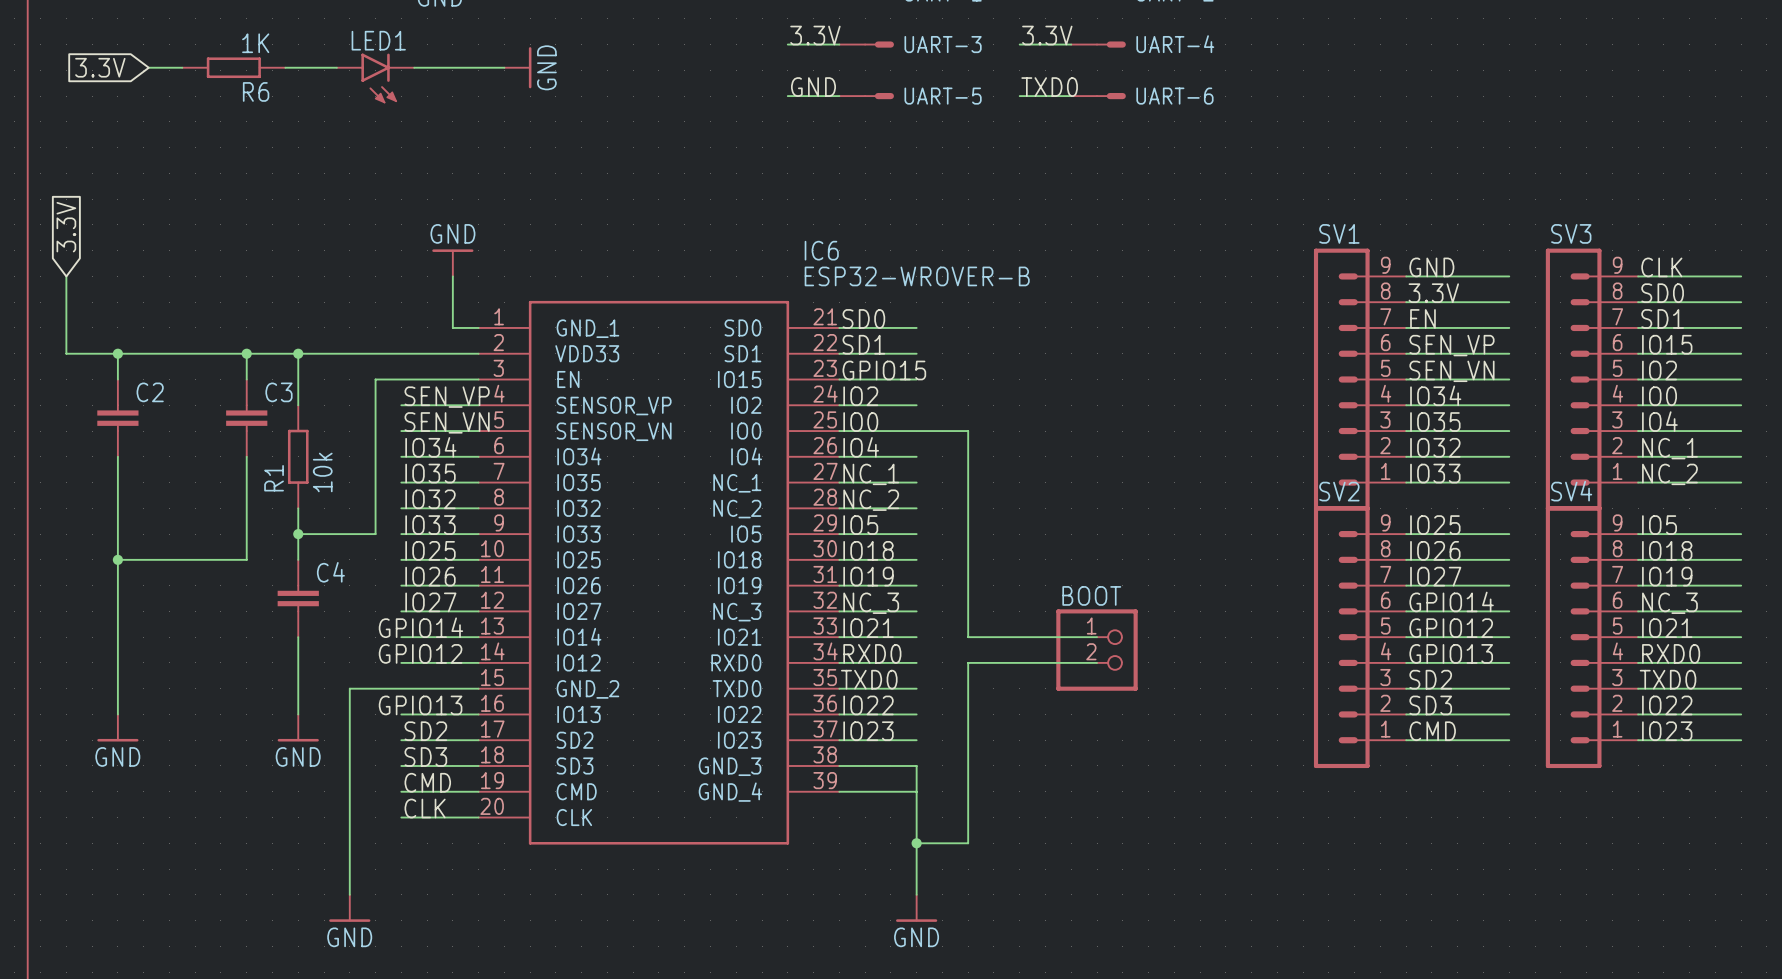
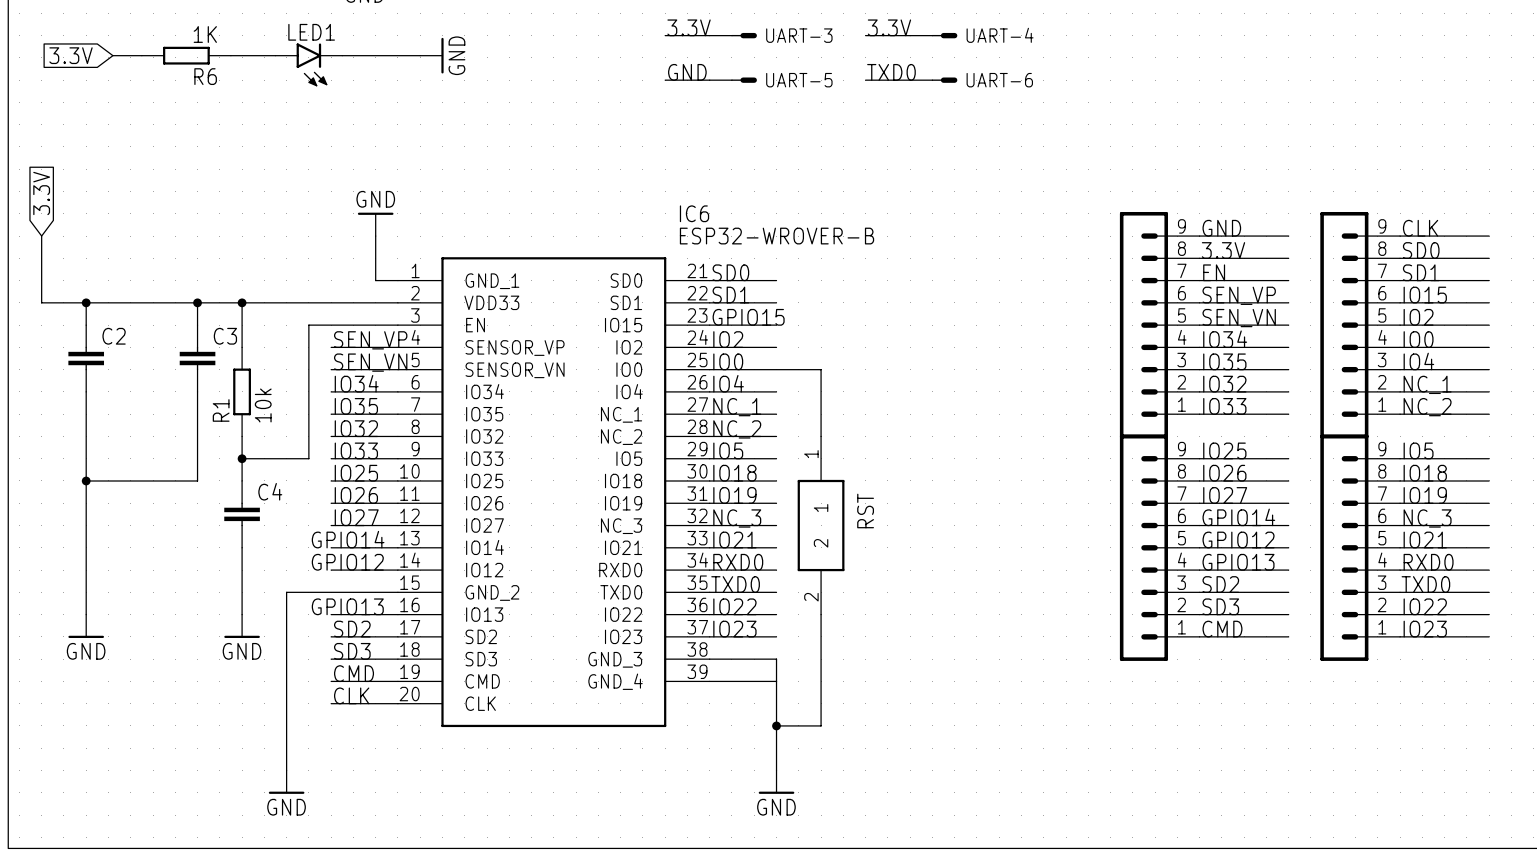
SV1 name: SV1 (1339, 233) -> none
SV3 name: SV3 (1571, 233) -> none
SV2 name: SV2 (1339, 491) -> none
SV4 name: SV4 (1571, 491) -> none
wire: (968, 508) (968, 637) (1097, 637) -> none
RST: none -> (821, 525)
BOOT: (1097, 650) -> none
wire: (1097, 662) (968, 662) (968, 714) -> none

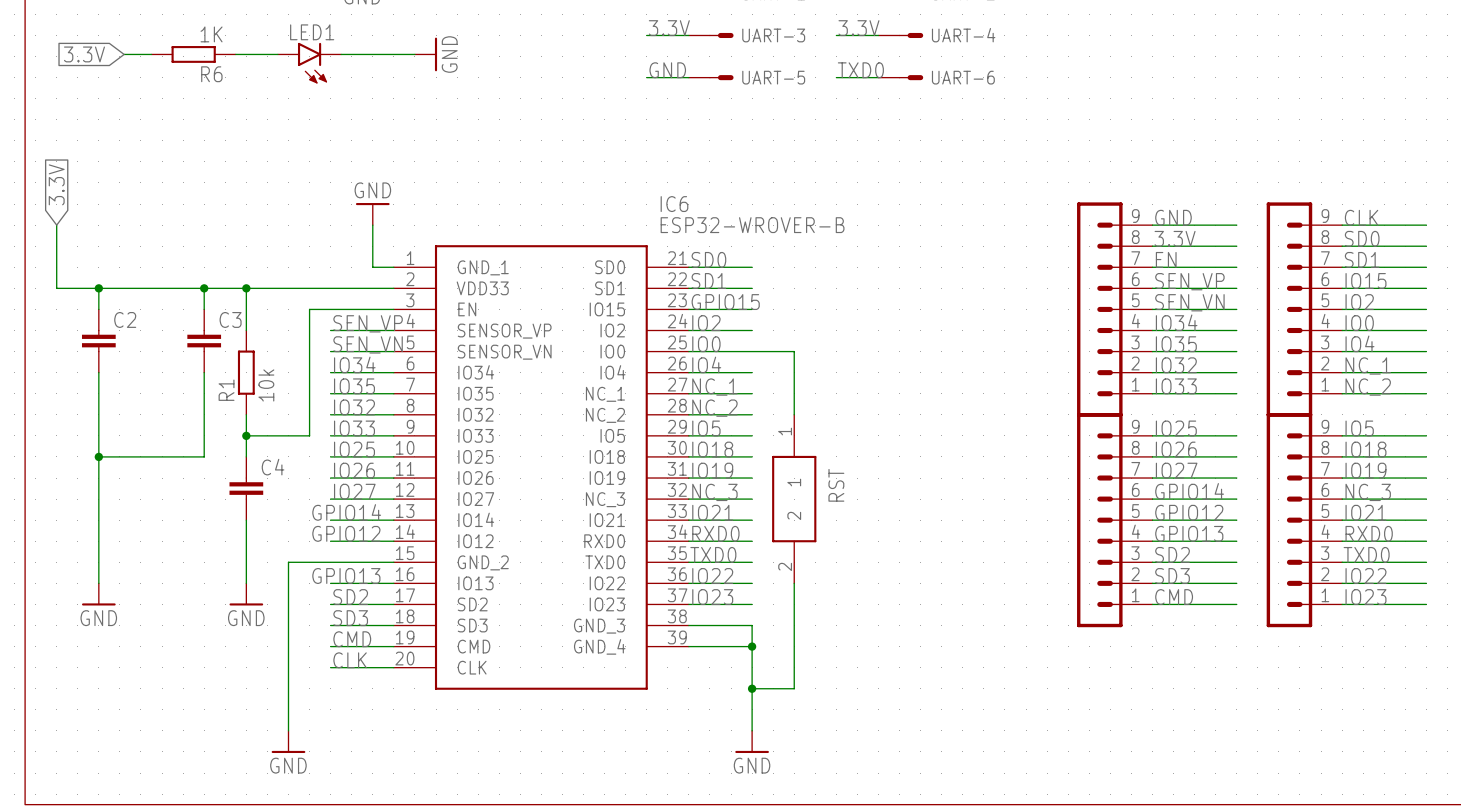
junction: none -> (752, 646)

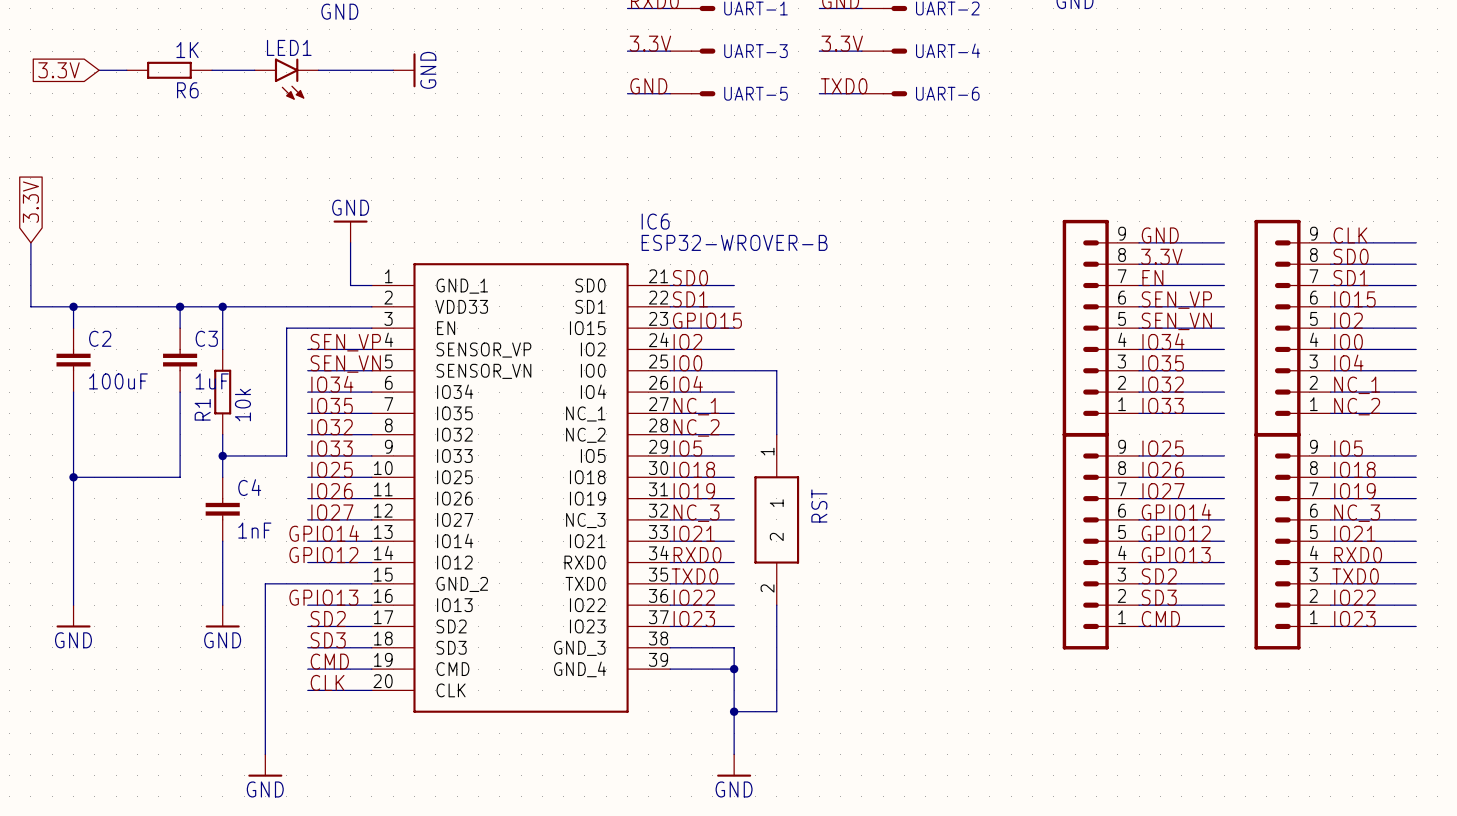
C2 value: none -> 100uF (118, 381)
C3 value: none -> 1uF (212, 381)
C4 value: none -> 1nF (254, 530)

